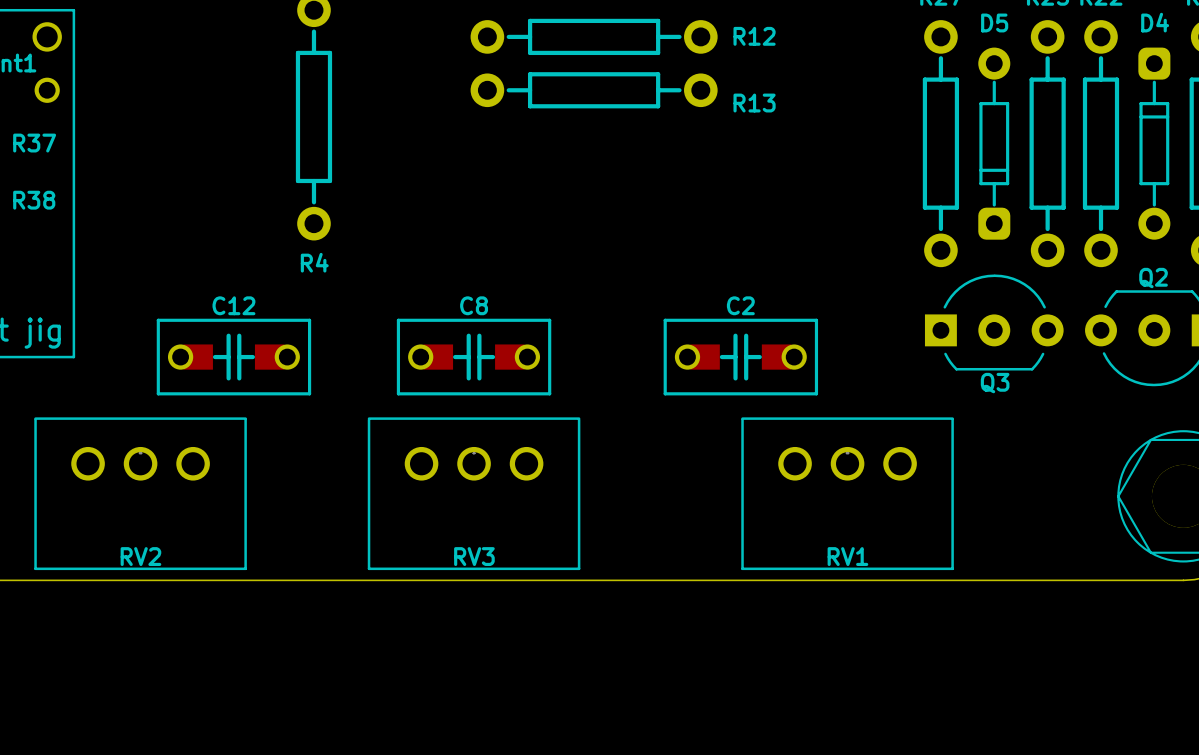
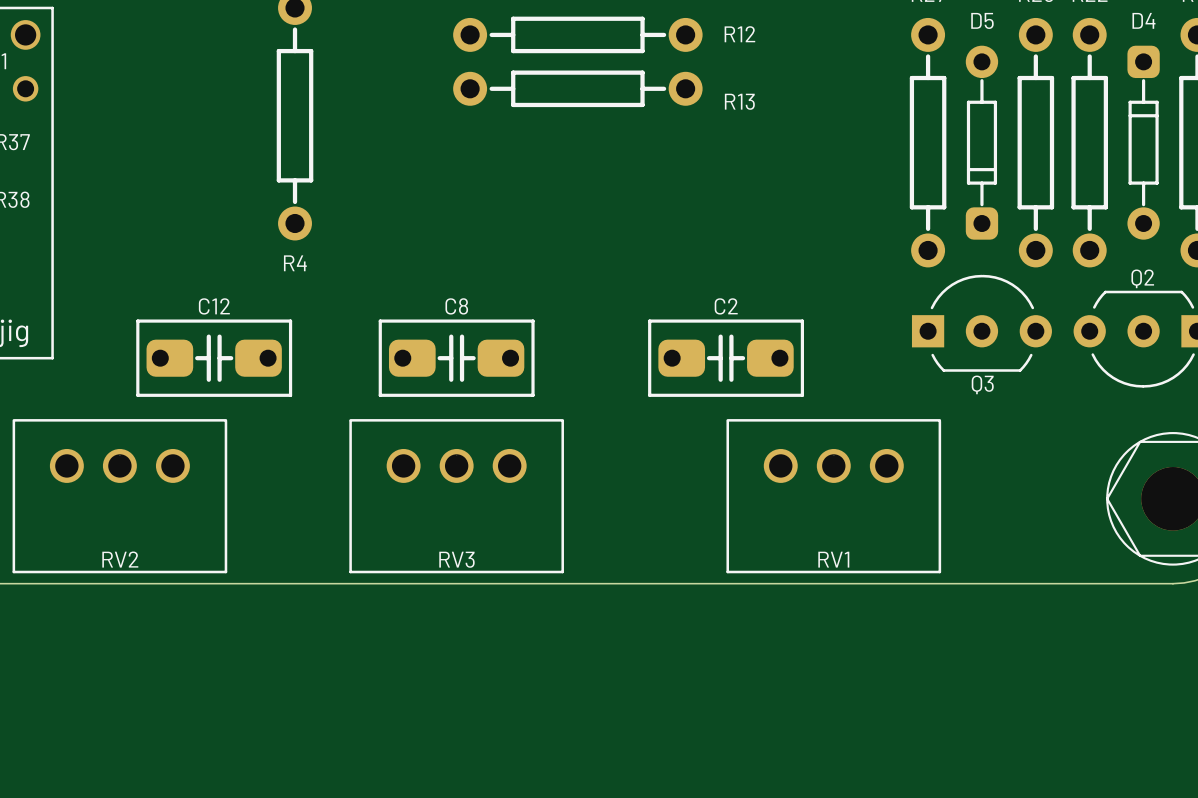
C12 footprint: [156, 318, 312, 396] -> [136, 319, 293, 397]
C8 footprint: [396, 318, 552, 396] -> [378, 319, 535, 397]
C2 footprint: [663, 318, 819, 396] -> [648, 319, 804, 397]

